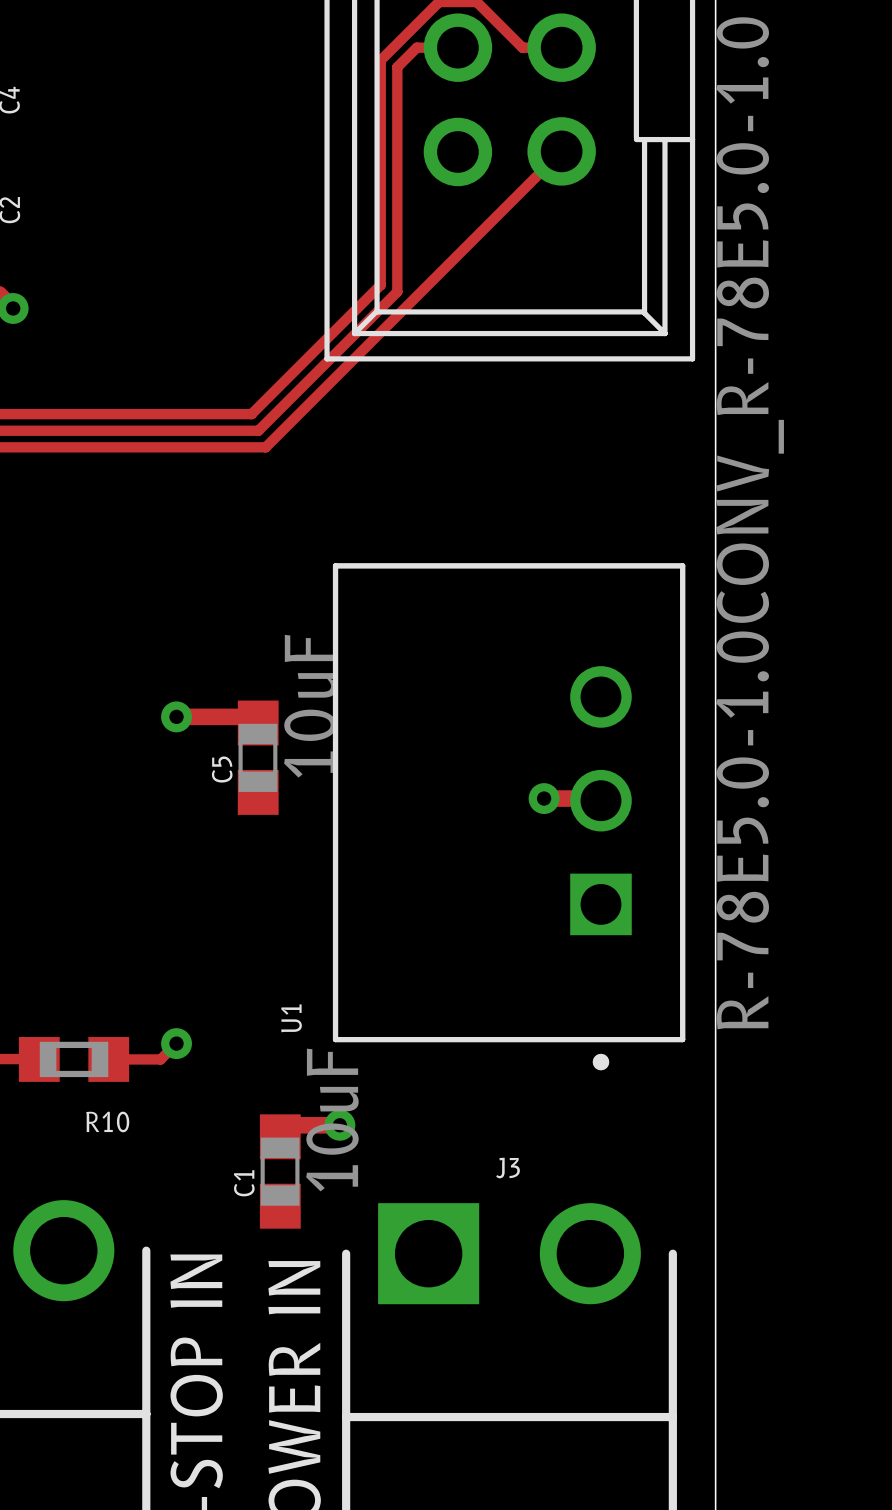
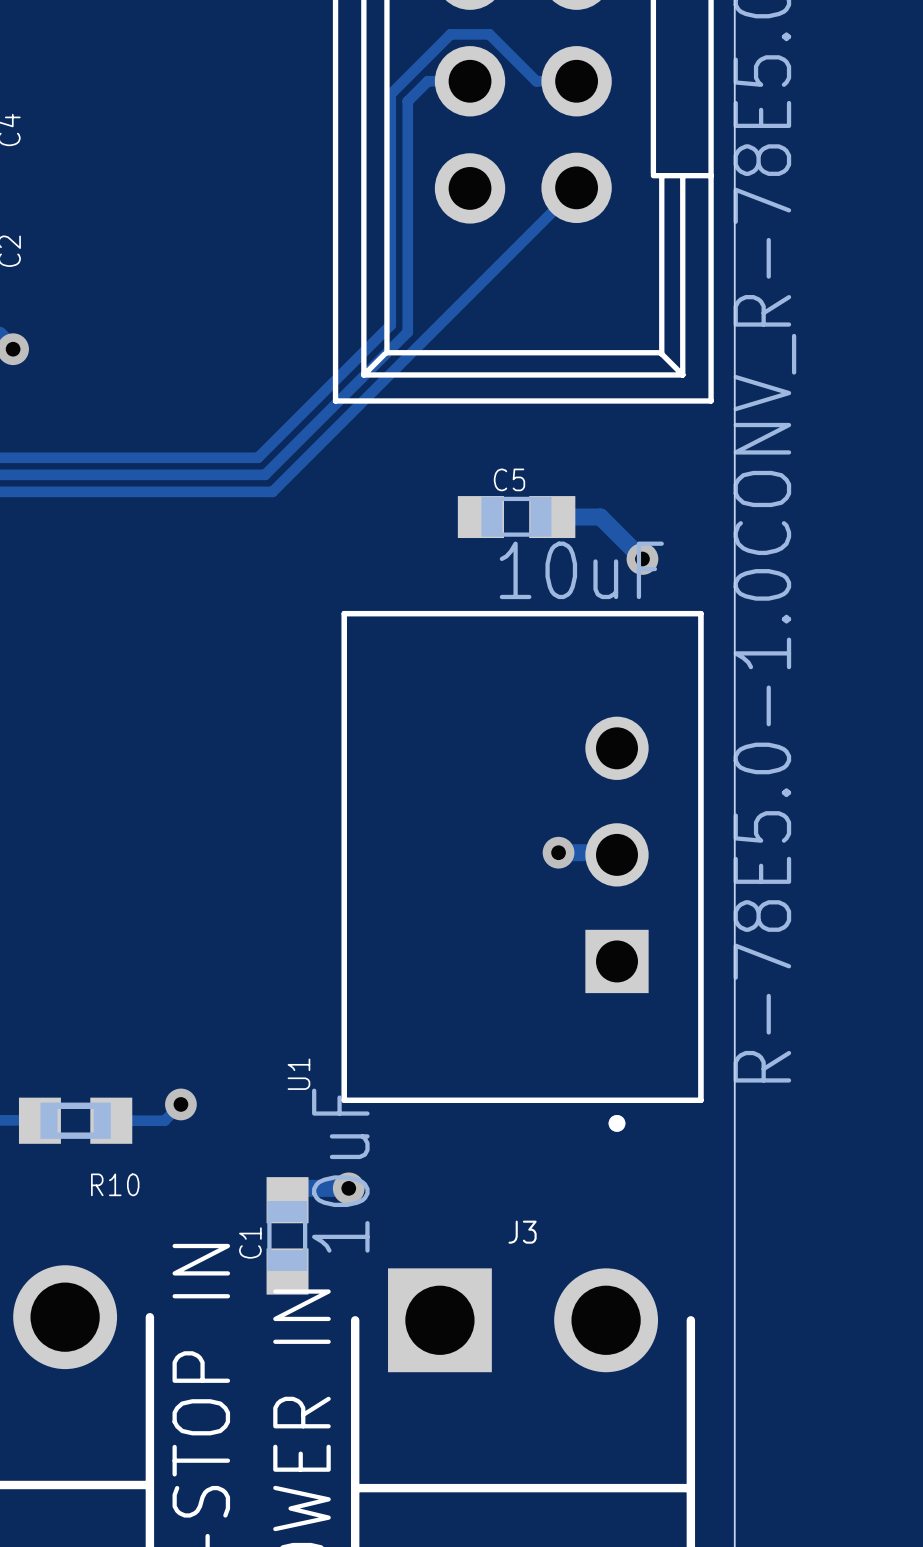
track: none -> (552, 517) (600, 517) (642, 559)
via: none -> (642, 559)
track: (176, 716) (252, 716) (258, 723) -> none
via: (176, 716) -> none
C5 rotation: 0° (258, 757) -> 90° clockwise (516, 517)
C5 position: (258, 757) -> (516, 517)

